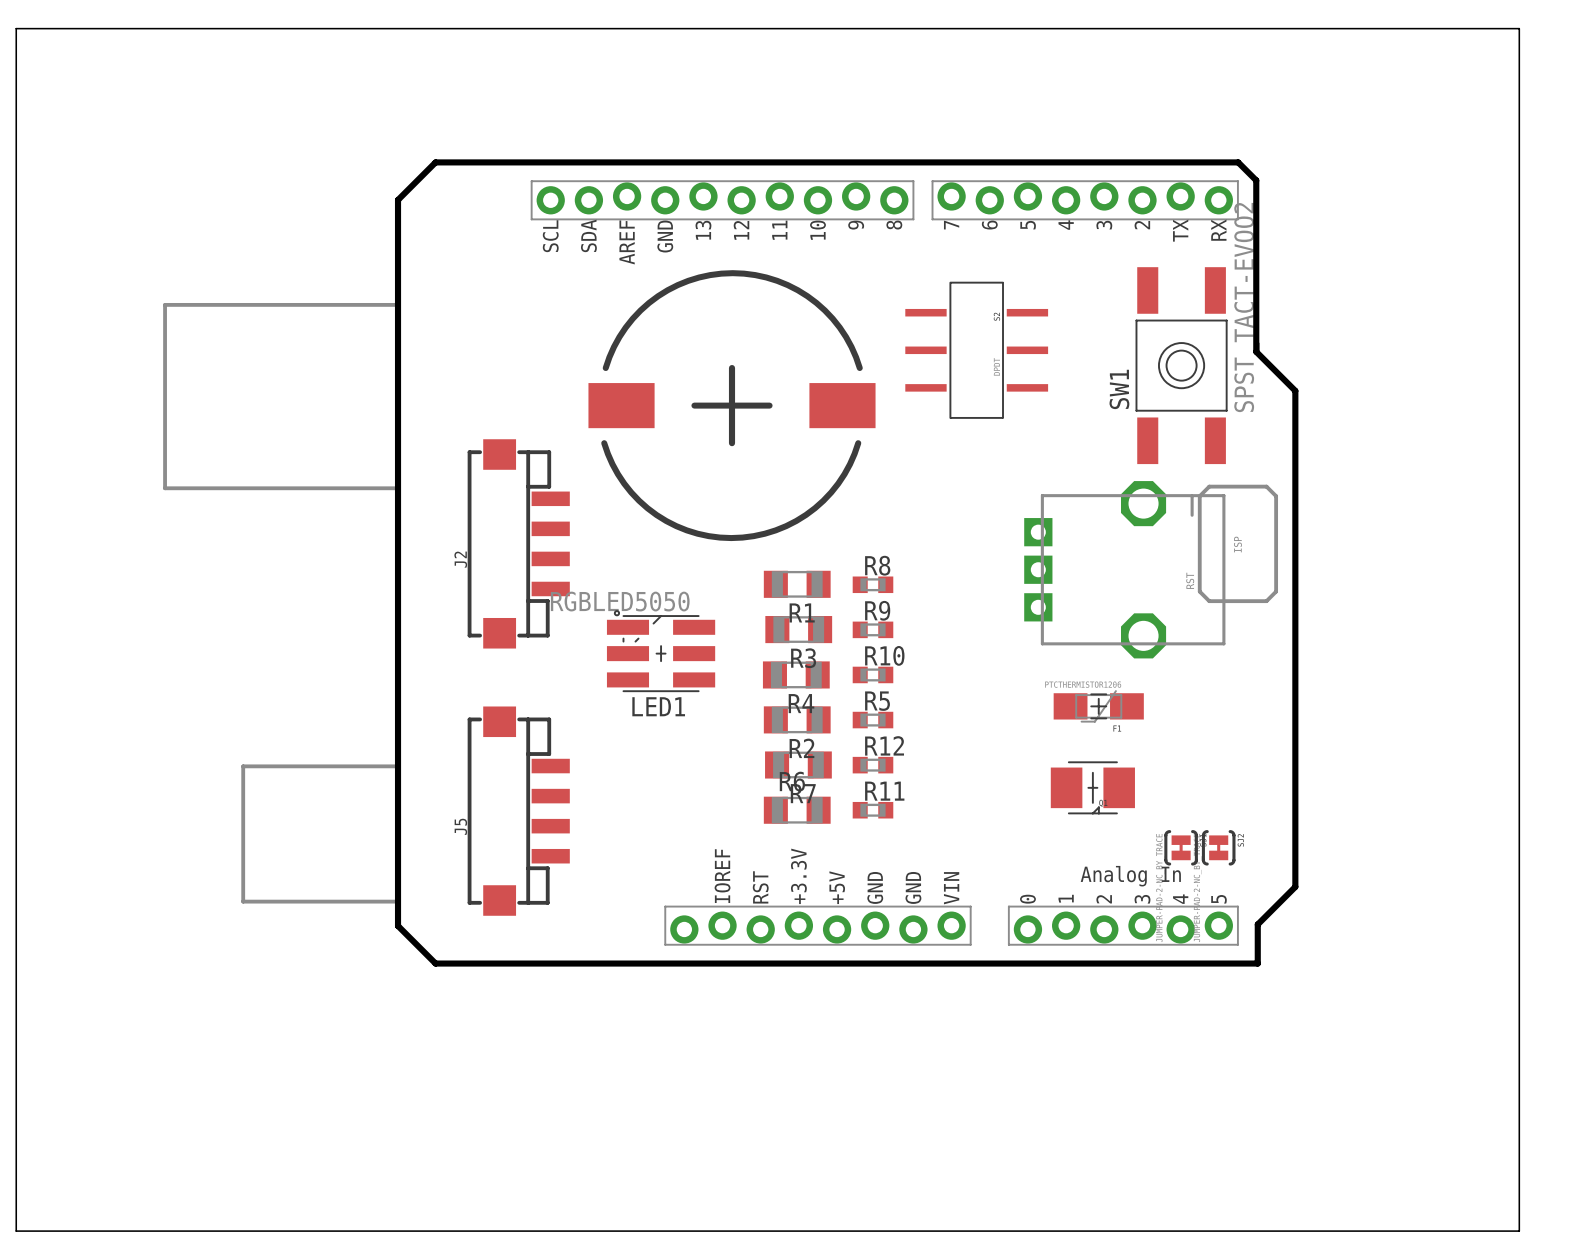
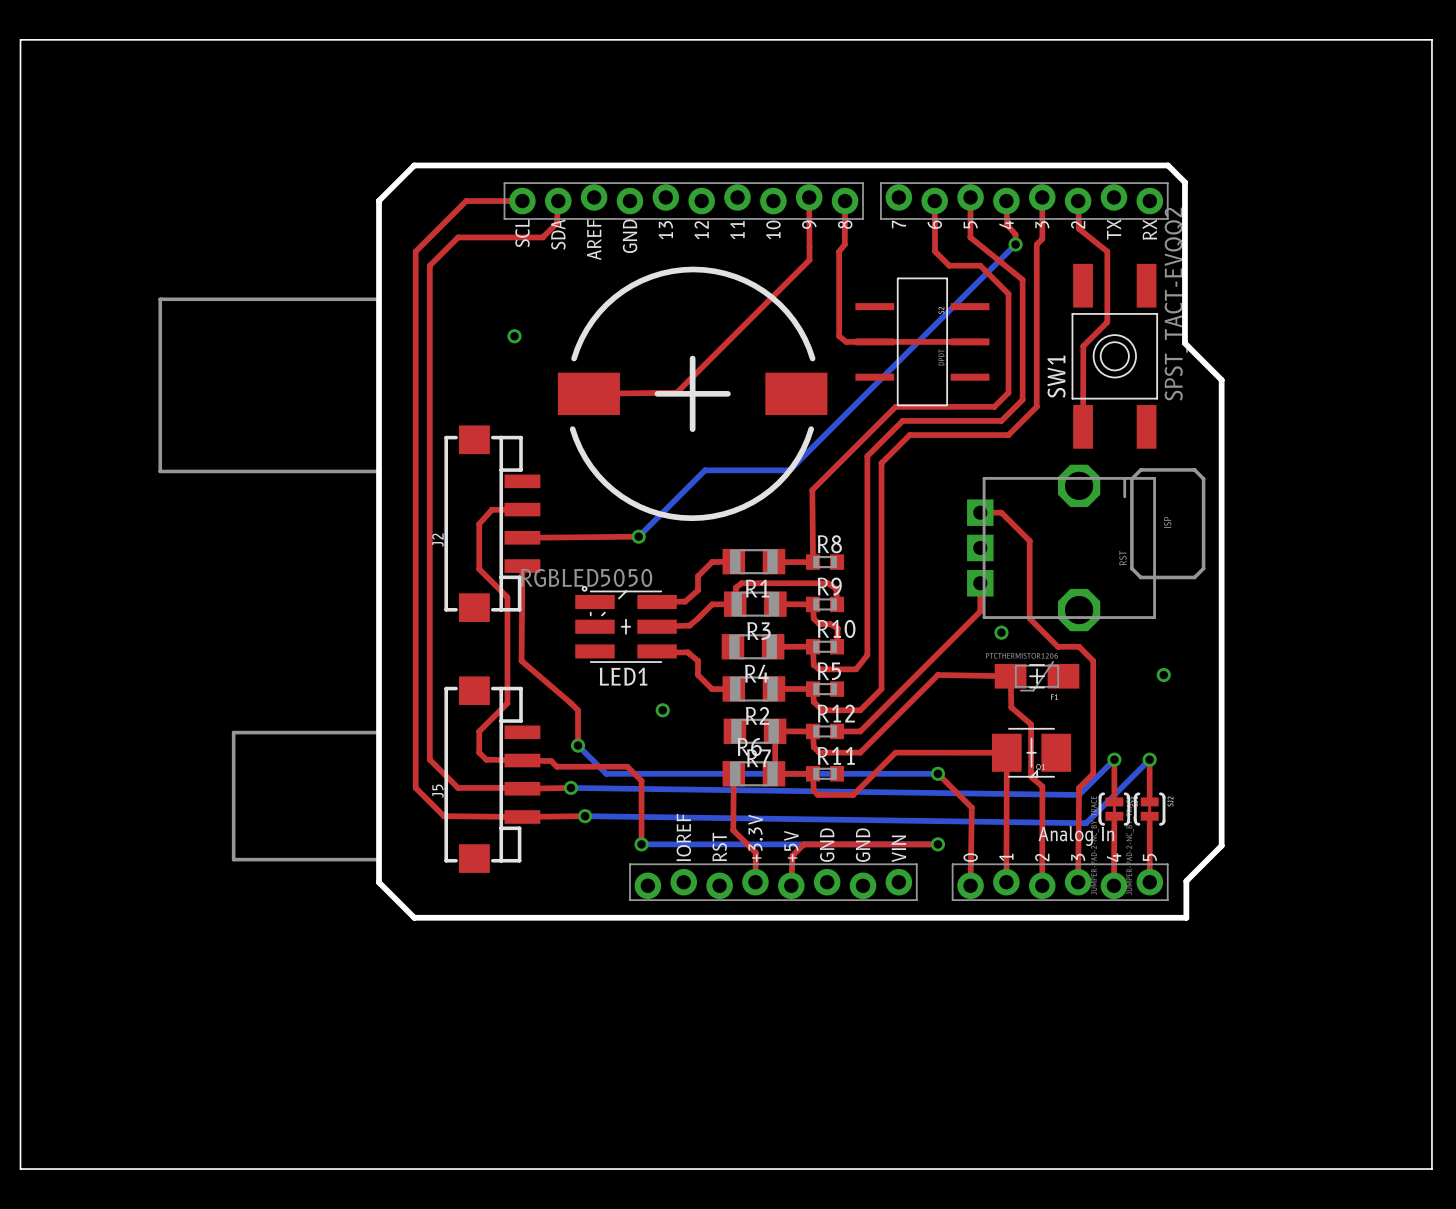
top track: none -> (809, 197) (809, 260) (676, 392) (588, 393)
top track: none -> (970, 197) (970, 237) (1022, 279) (1022, 399) (1001, 420) (902, 420) (867, 456) (867, 655) (856, 669) (819, 669) (813, 665) (813, 646) (773, 646)
top track: none -> (1042, 197) (1042, 238) (1036, 244) (1036, 406) (1008, 435) (909, 435) (881, 463) (881, 689) (860, 710) (822, 710) (813, 701) (813, 689)
top track: none -> (522, 201) (466, 201) (415, 251) (415, 787) (443, 816) (585, 816)
top track: none -> (558, 201) (556, 223) (542, 237) (458, 237) (429, 265) (429, 759) (458, 787) (514, 787)
top track: none -> (845, 201) (844, 244) (839, 251) (839, 336) (846, 341) (970, 341)
top track: none -> (934, 201) (935, 251) (949, 265) (980, 265) (1008, 293) (1008, 392) (994, 406) (895, 406) (812, 490) (813, 562) (773, 561)
top track: none -> (1006, 201) (1007, 224) (1015, 234) (1015, 244)
top track: none -> (1078, 201) (1079, 228) (1107, 251) (1107, 322) (1083, 346) (1083, 426)
bottom track: none -> (1015, 244) (789, 470) (705, 470) (638, 536)
via: none -> (1015, 244)
via: none -> (514, 336)
top track: none -> (522, 509) (491, 509) (479, 523) (479, 569) (507, 597) (507, 703) (479, 731) (479, 752) (486, 759) (551, 761) (556, 766) (627, 766) (641, 780) (641, 844)
top track: none -> (980, 512) (1001, 512) (1029, 540) (1029, 618) (1057, 646) (1079, 646) (1093, 660) (1093, 773) (1079, 787) (1078, 882)
top track: none -> (638, 536) (522, 537)
via: none -> (638, 536)
top track: none -> (733, 561) (712, 562) (698, 576) (698, 590) (685, 601) (657, 602)
top track: none -> (522, 566) (521, 660) (578, 710) (578, 745)
top track: none -> (980, 583) (980, 611) (860, 731) (837, 731)
top track: none -> (775, 604) (813, 604) (813, 618) (819, 624) (830, 624) (837, 628) (837, 646)
top track: none -> (837, 604) (836, 588) (827, 583) (741, 583) (736, 587) (735, 604) (712, 604) (689, 625) (657, 626)
via: none -> (1001, 632)
top track: none -> (657, 651) (688, 652) (698, 660) (698, 675) (712, 689) (733, 688)
via: none -> (1163, 675)
top track: none -> (773, 688) (812, 688)
via: none -> (662, 710)
bottom track: none -> (578, 745) (606, 773) (937, 773)
via: none -> (578, 745)
top track: none -> (1114, 759) (1114, 801)
bottom track: none -> (1114, 759) (1079, 794) (570, 787)
via: none -> (1114, 759)
top track: none -> (1149, 759) (1149, 801)
bottom track: none -> (1149, 759) (1086, 823) (585, 816)
via: none -> (1149, 759)
top track: none -> (733, 773) (733, 830) (755, 852) (755, 882)
top track: none -> (773, 773) (813, 773) (813, 790) (817, 794) (853, 794) (895, 752) (1006, 752) (1006, 882)
top track: none -> (775, 773) (775, 731) (813, 731) (813, 746) (819, 752) (860, 752) (937, 675) (1010, 676) (1011, 707) (1031, 724) (1031, 776) (1042, 786) (1042, 885)
top track: none -> (937, 773) (971, 807) (970, 885)
via: none -> (937, 773)
top track: none -> (570, 787) (522, 788)
via: none -> (570, 787)
via: none -> (585, 816)
top track: none -> (1114, 816) (1113, 885)
top track: none -> (1149, 816) (1149, 882)
bottom track: none -> (641, 844) (937, 844)
via: none -> (641, 844)
top track: none -> (937, 844) (803, 844) (792, 855) (791, 885)
via: none -> (937, 844)

